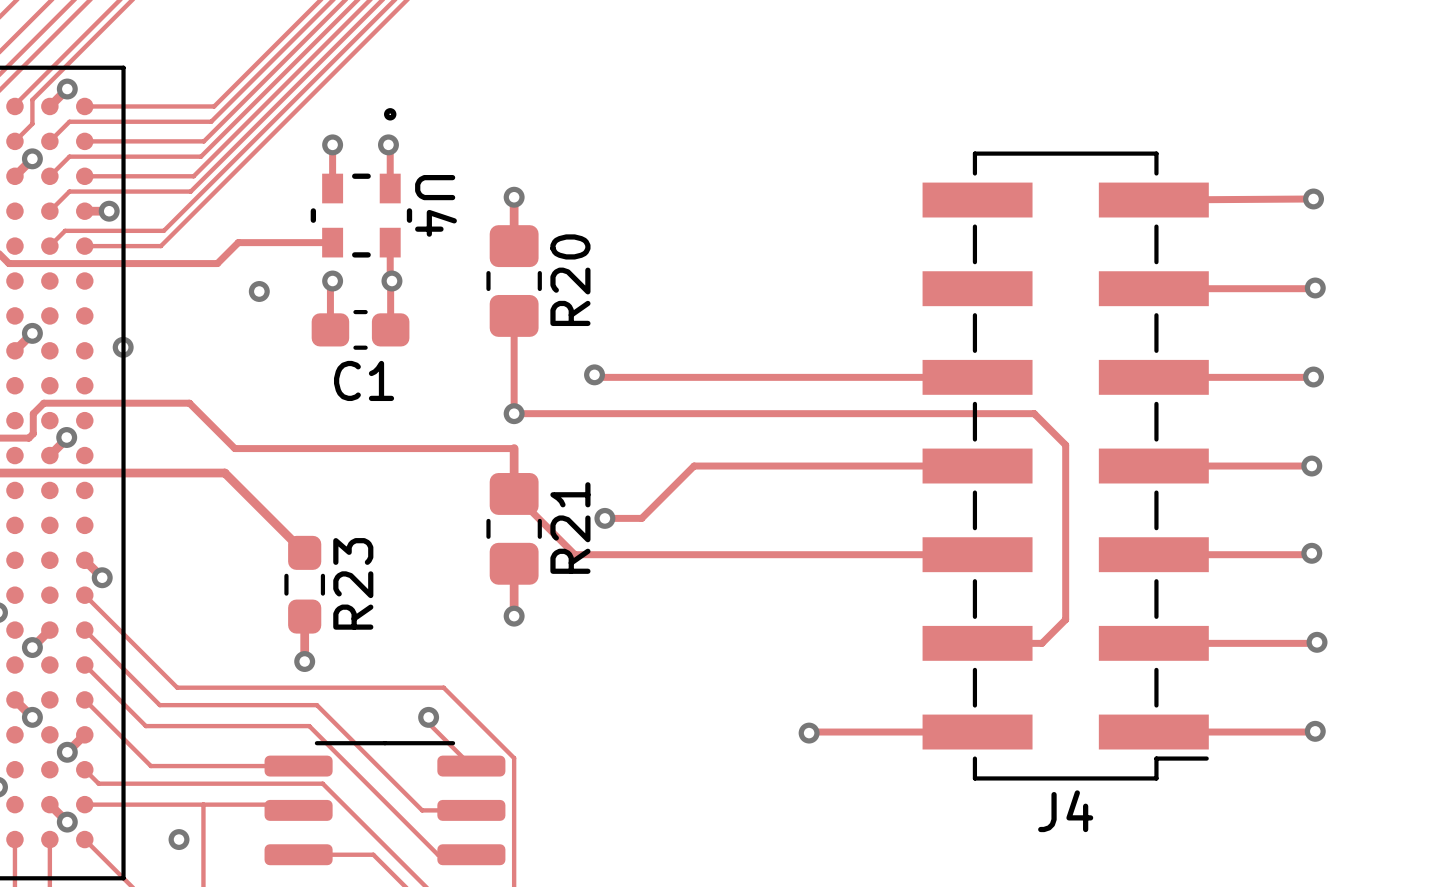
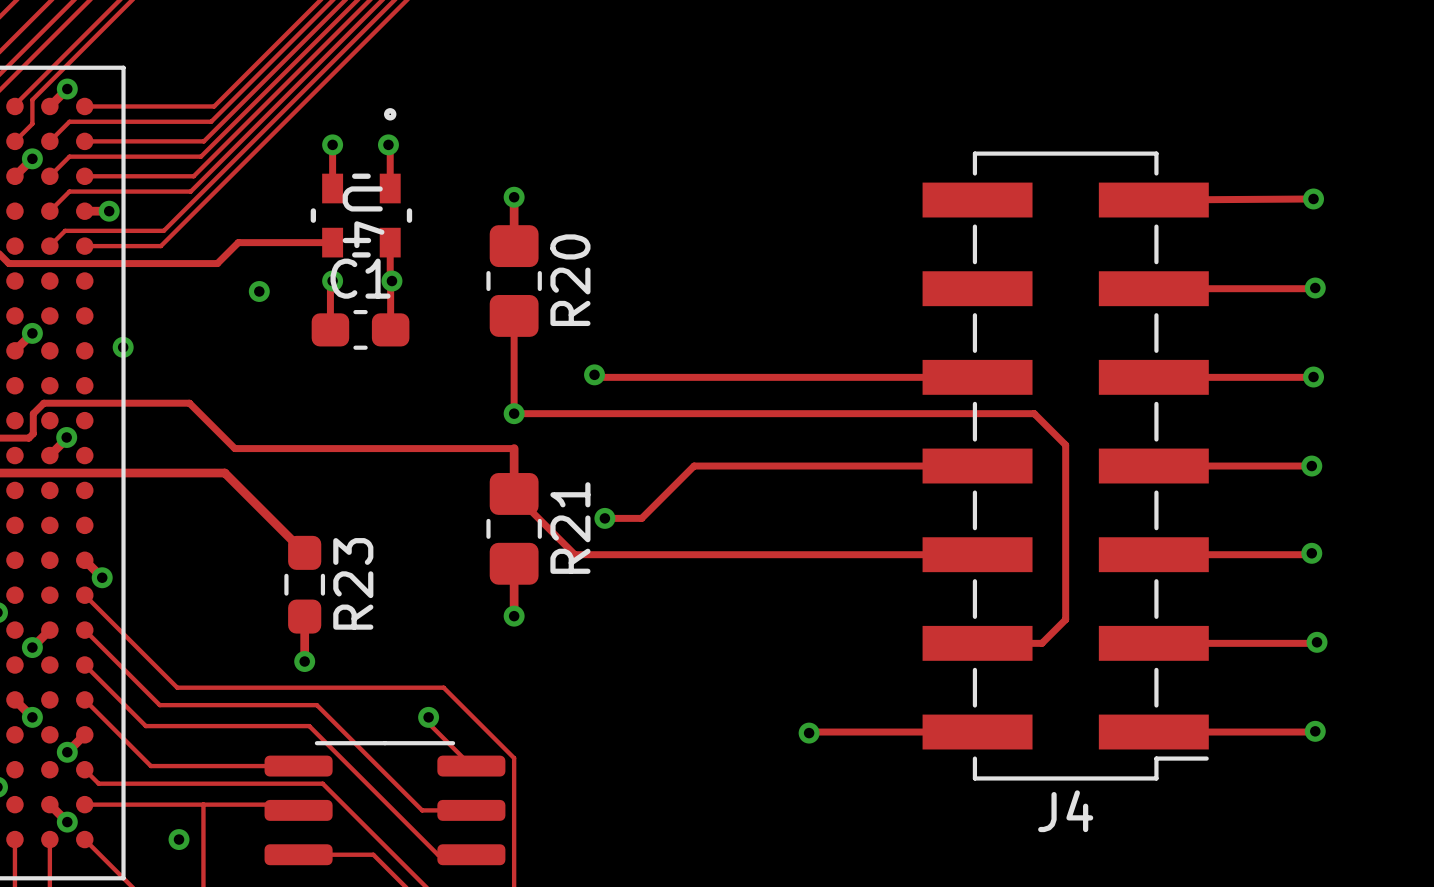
U4 name position: U4 (435, 205) -> U4 (363, 217)
C1 name position: C1 (364, 380) -> C1 (360, 278)

